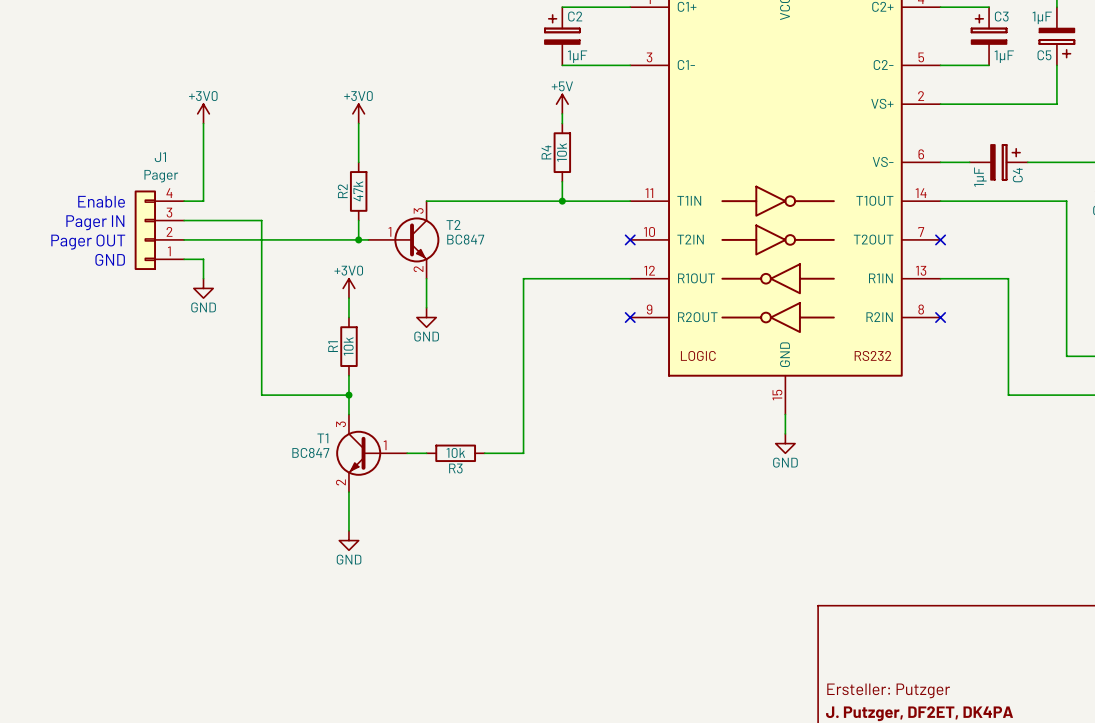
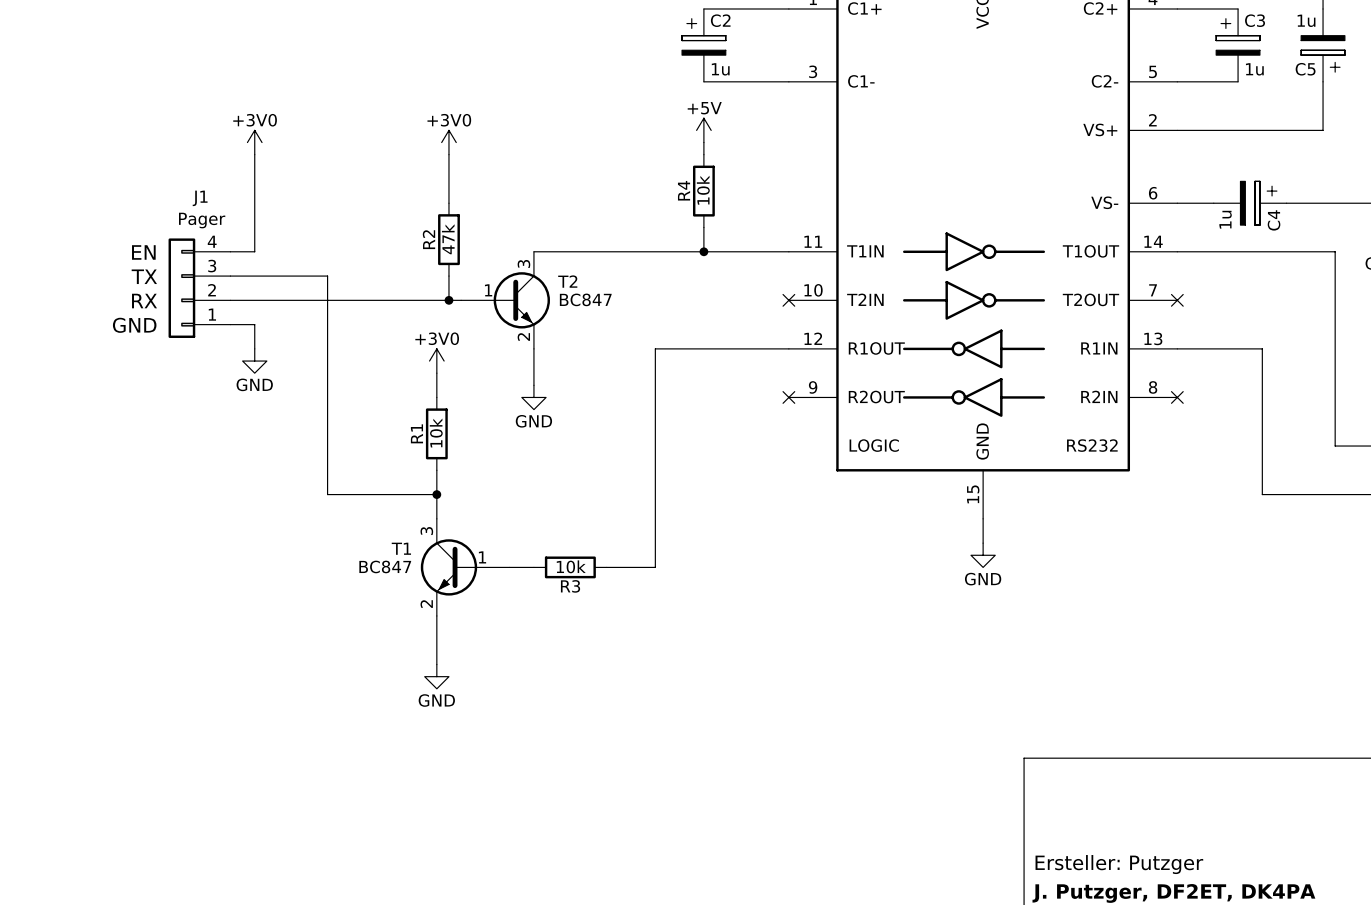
C5 value: 1µF (1042, 17) -> 1u (1306, 20)
C2 value: 1µF (577, 56) -> 1u (720, 69)
C3 value: 1µF (1004, 56) -> 1u (1254, 69)
C4 value: 1µF (980, 177) -> 1u (1225, 219)
text: Enable (101, 201) -> EN (143, 252)
text: Pager IN (95, 222) -> TX (144, 276)
text: Pager OUT (88, 242) -> RX (144, 301)

